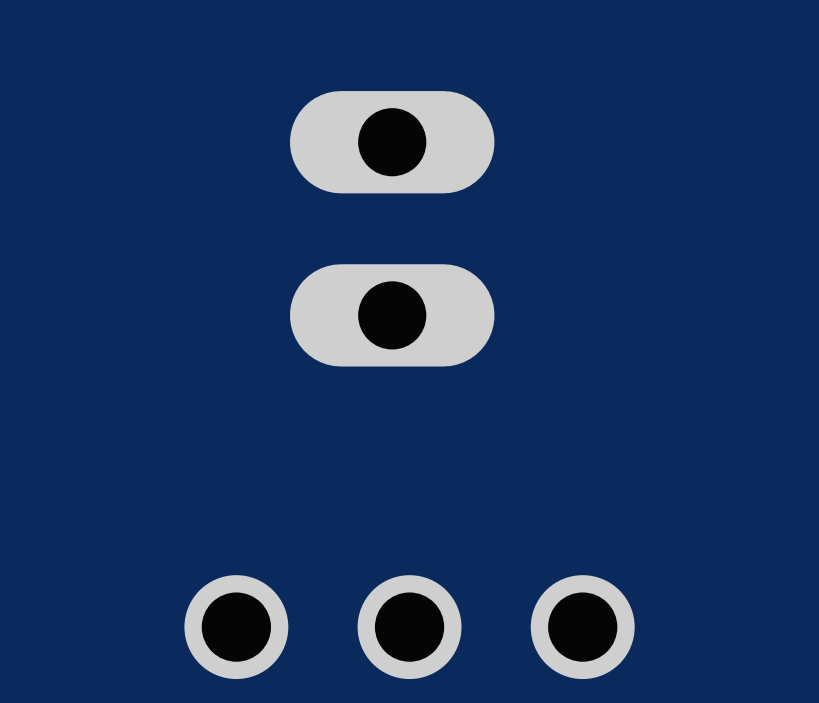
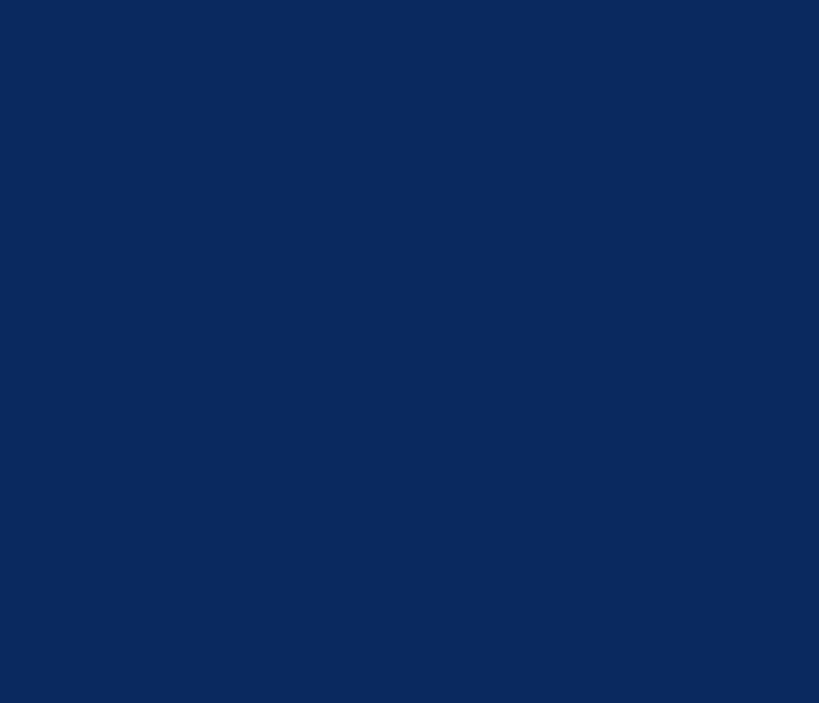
part: (392, 228) -> none
part: (409, 627) -> none

